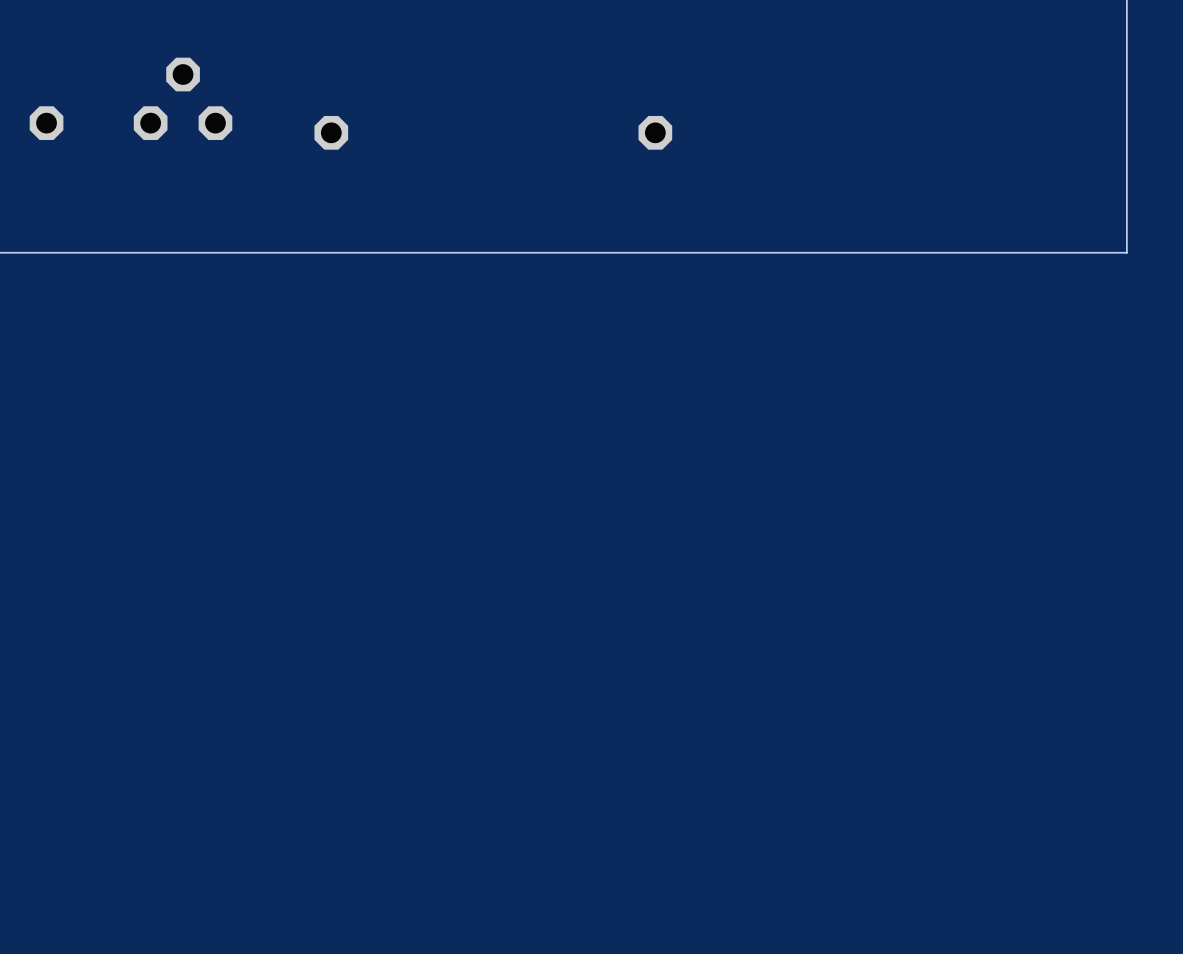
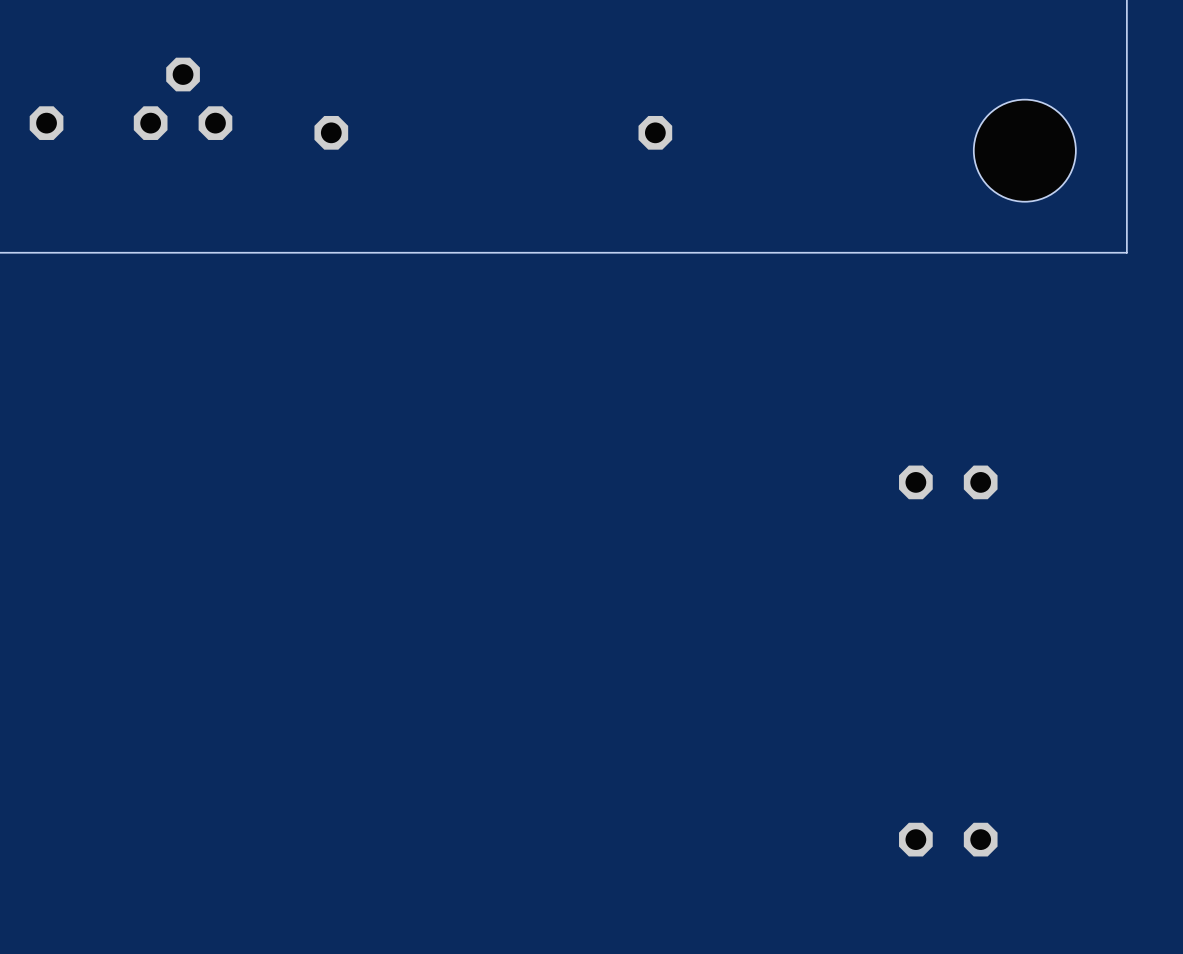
hole: none -> (1024, 150)
part: none -> (948, 482)
part: none -> (948, 839)

